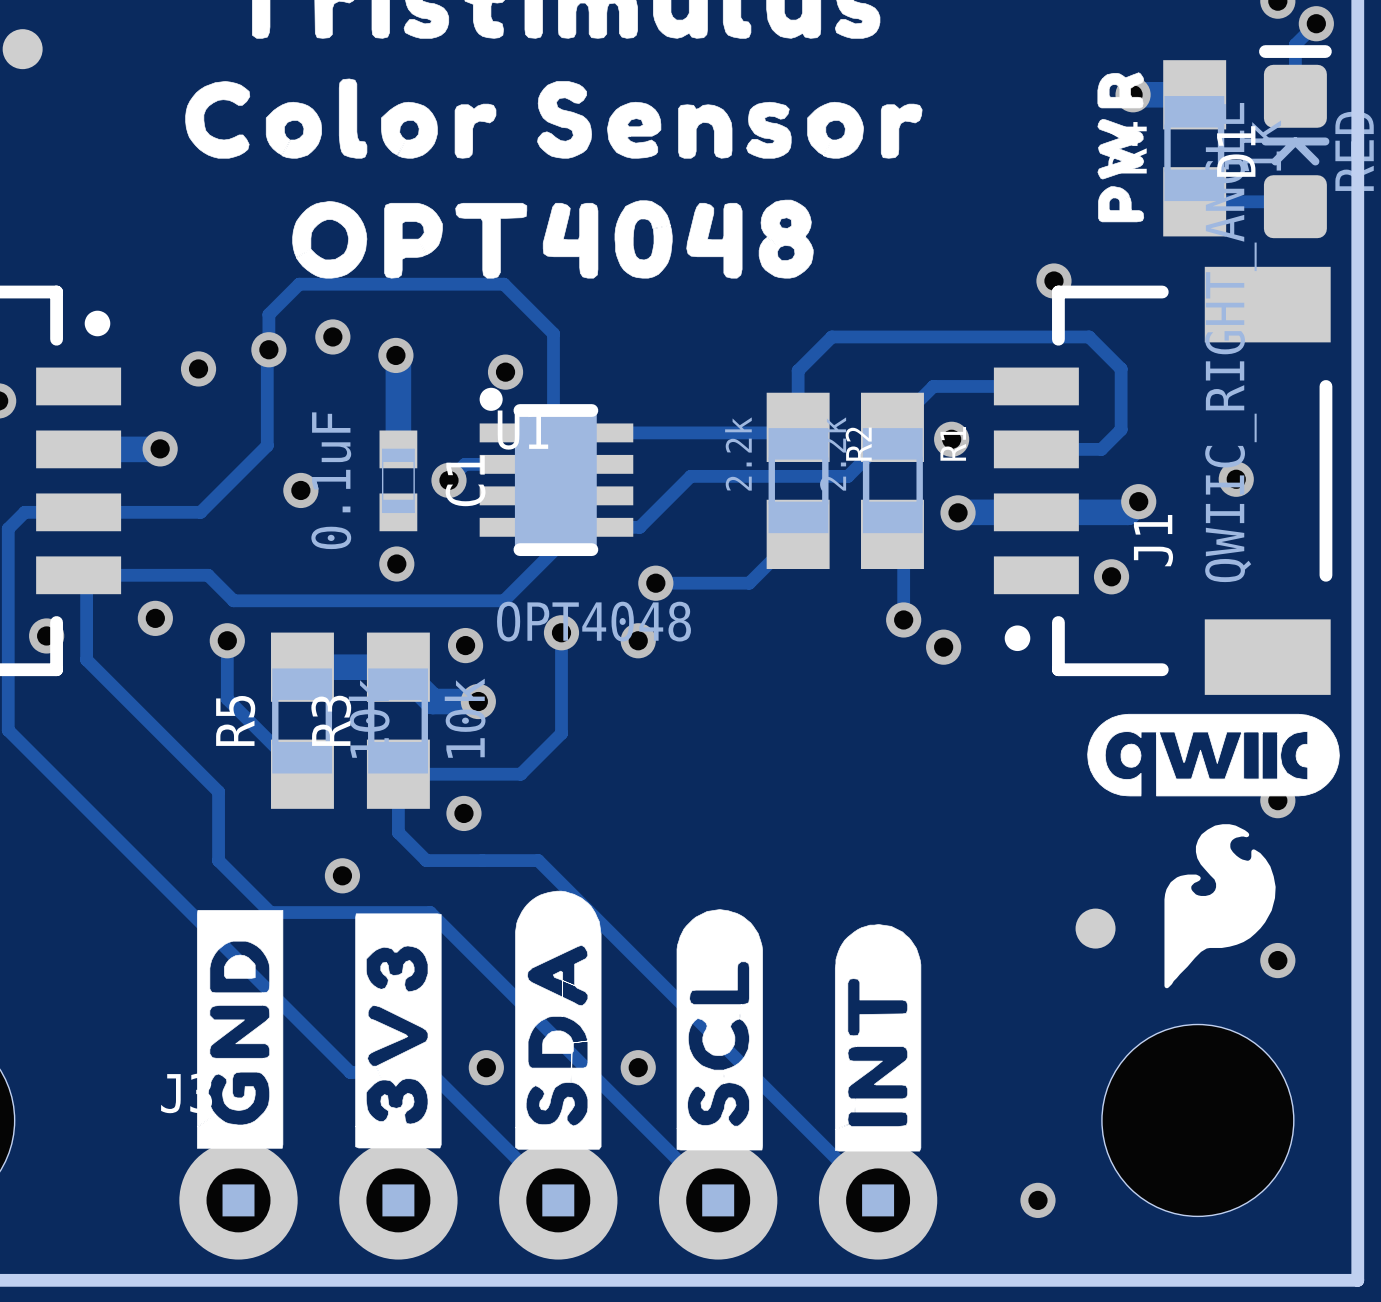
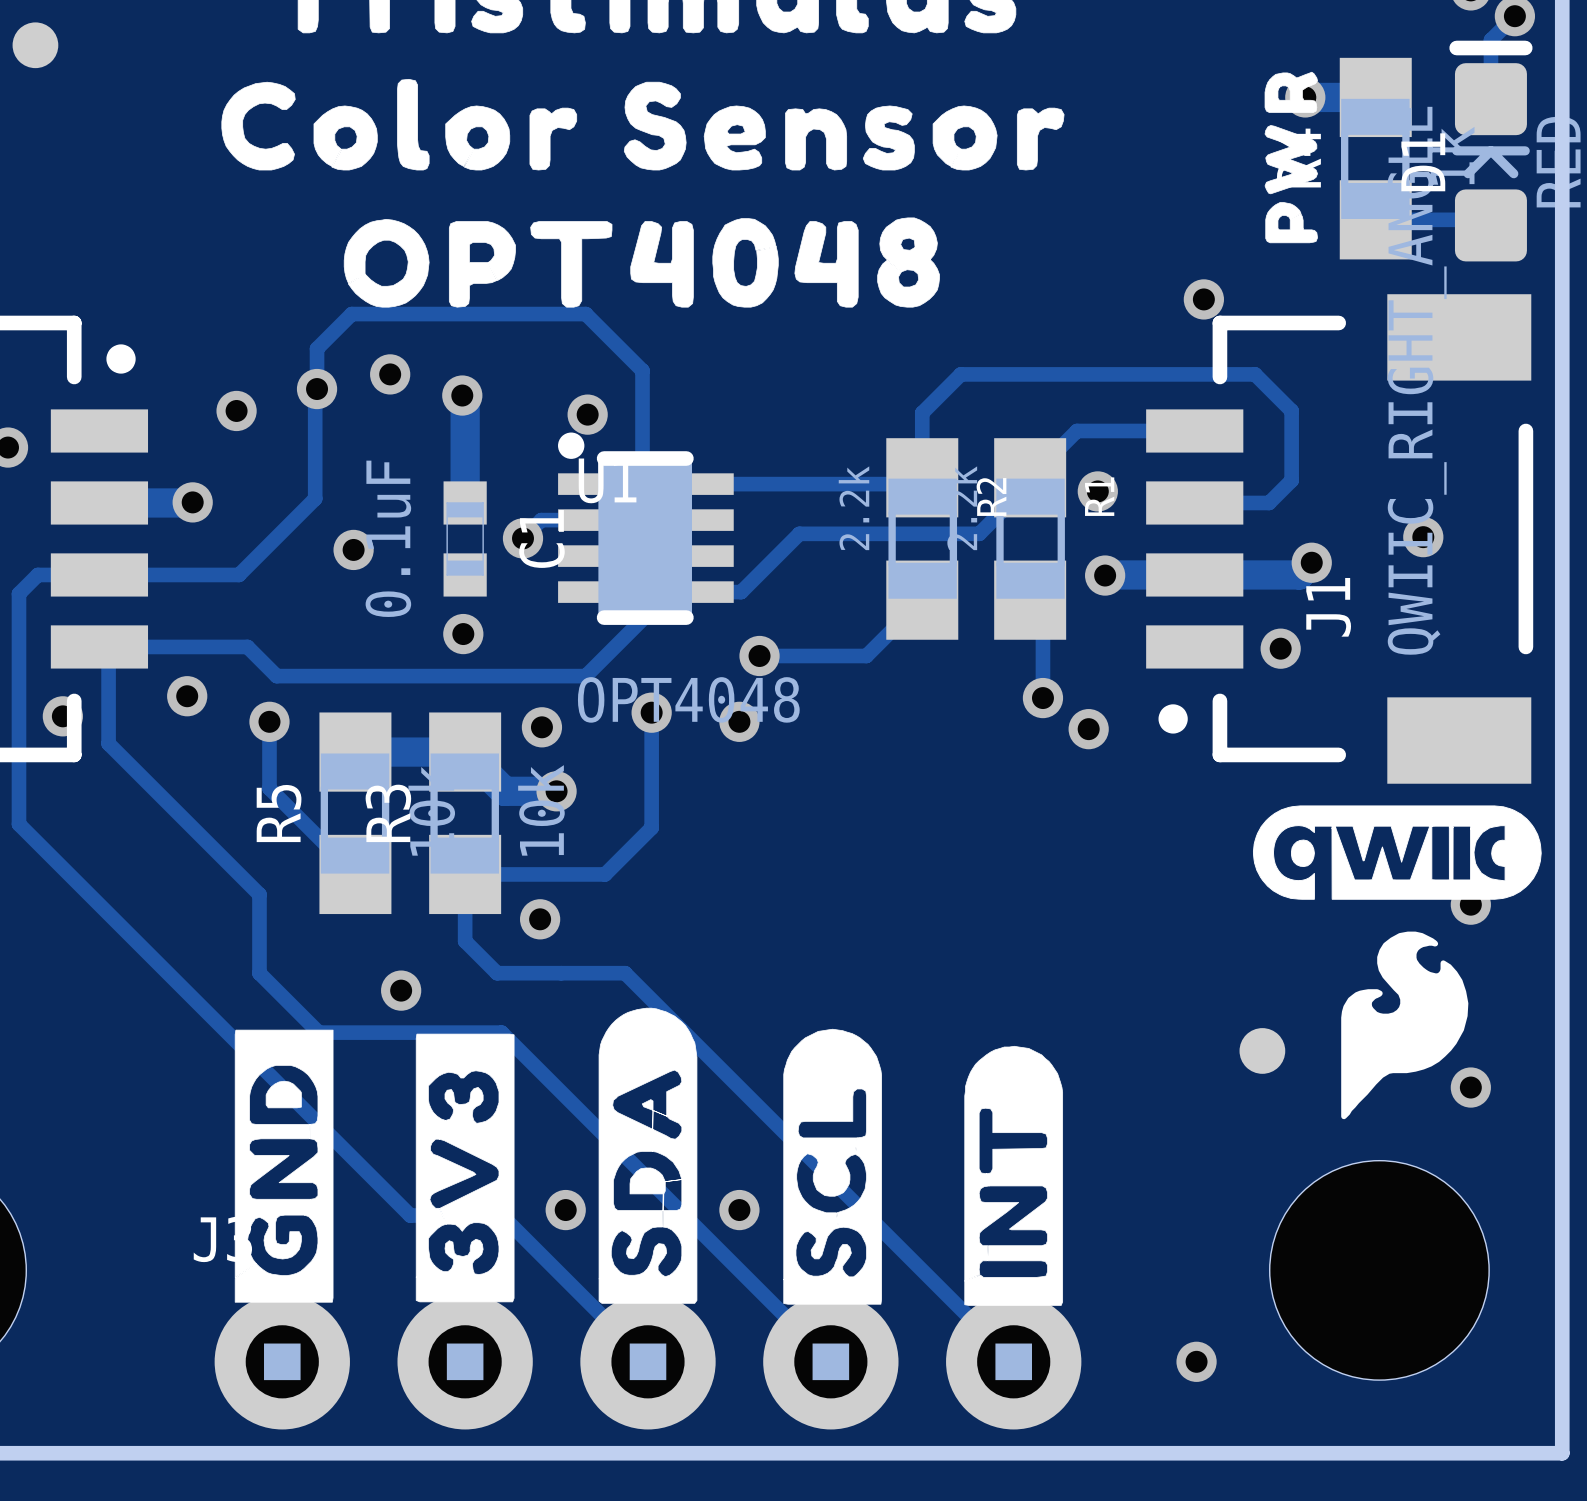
via position: (1053, 281) -> (1203, 299)

